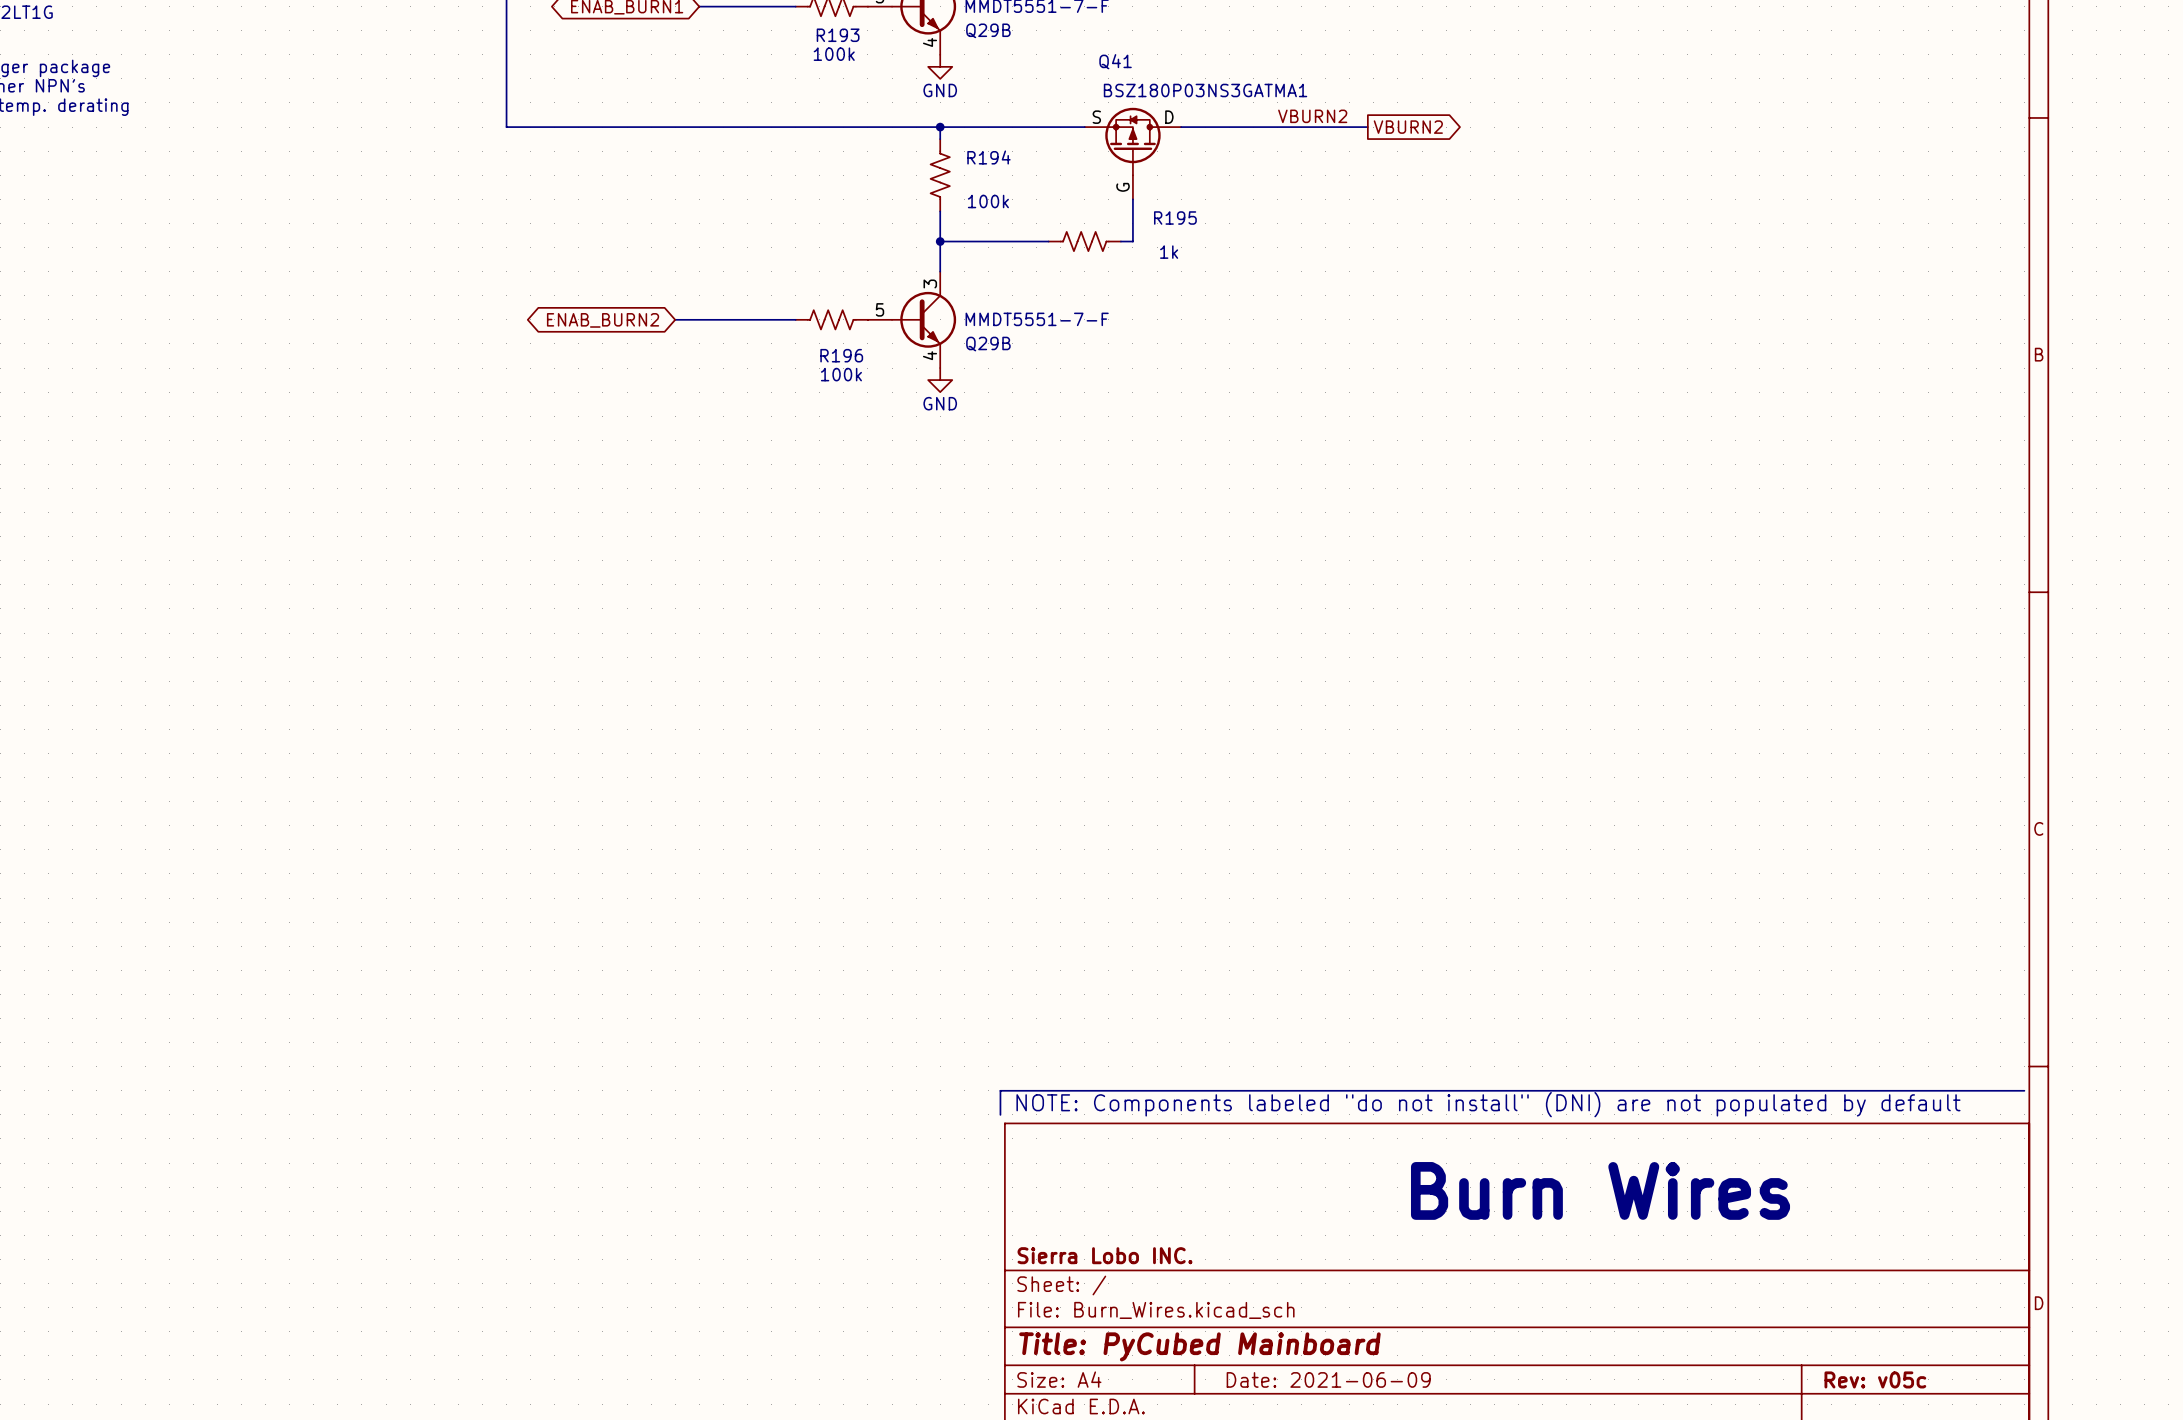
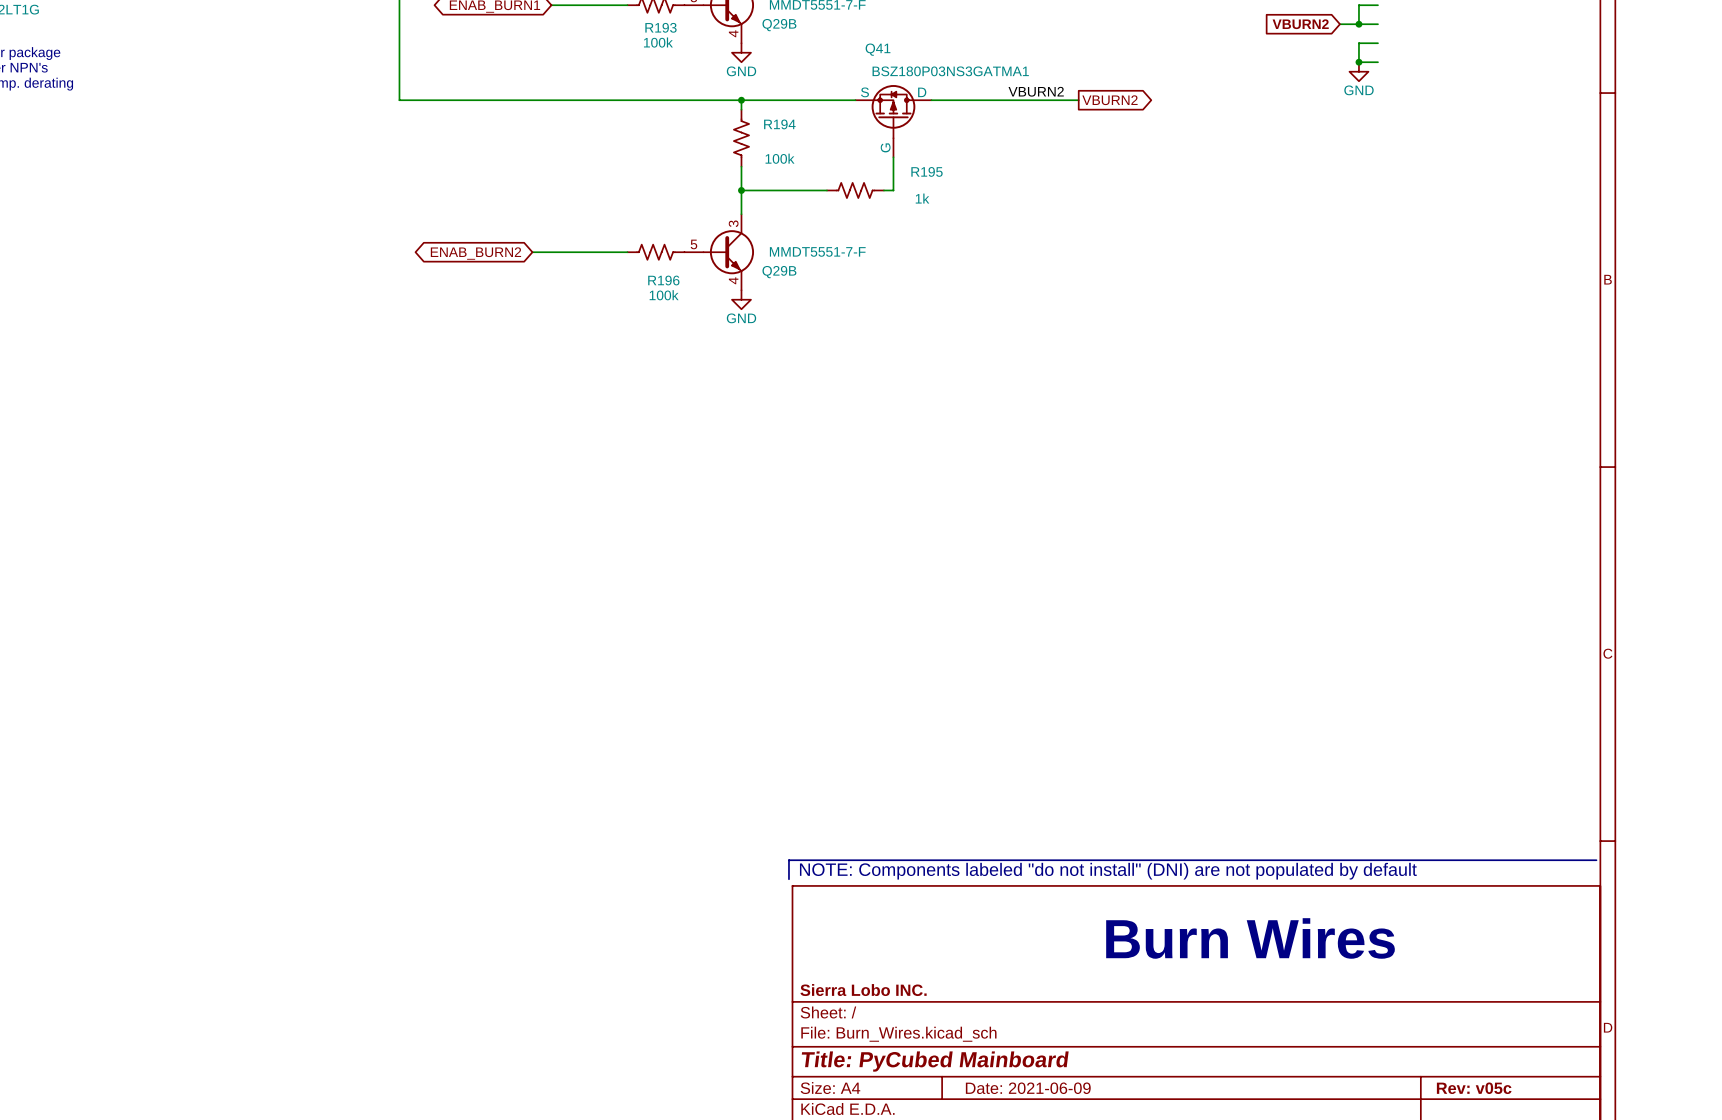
wire: none -> (1377, 5) (1358, 5) (1358, 24)
global label: none -> VBURN2 (1300, 24)
wire: none -> (1339, 24) (1377, 24)
junction: none -> (1358, 24)
wire: none -> (1377, 43) (1358, 43) (1358, 62) (1377, 62)
junction: none -> (1358, 62)
power symbol: none -> GND (1358, 71)

